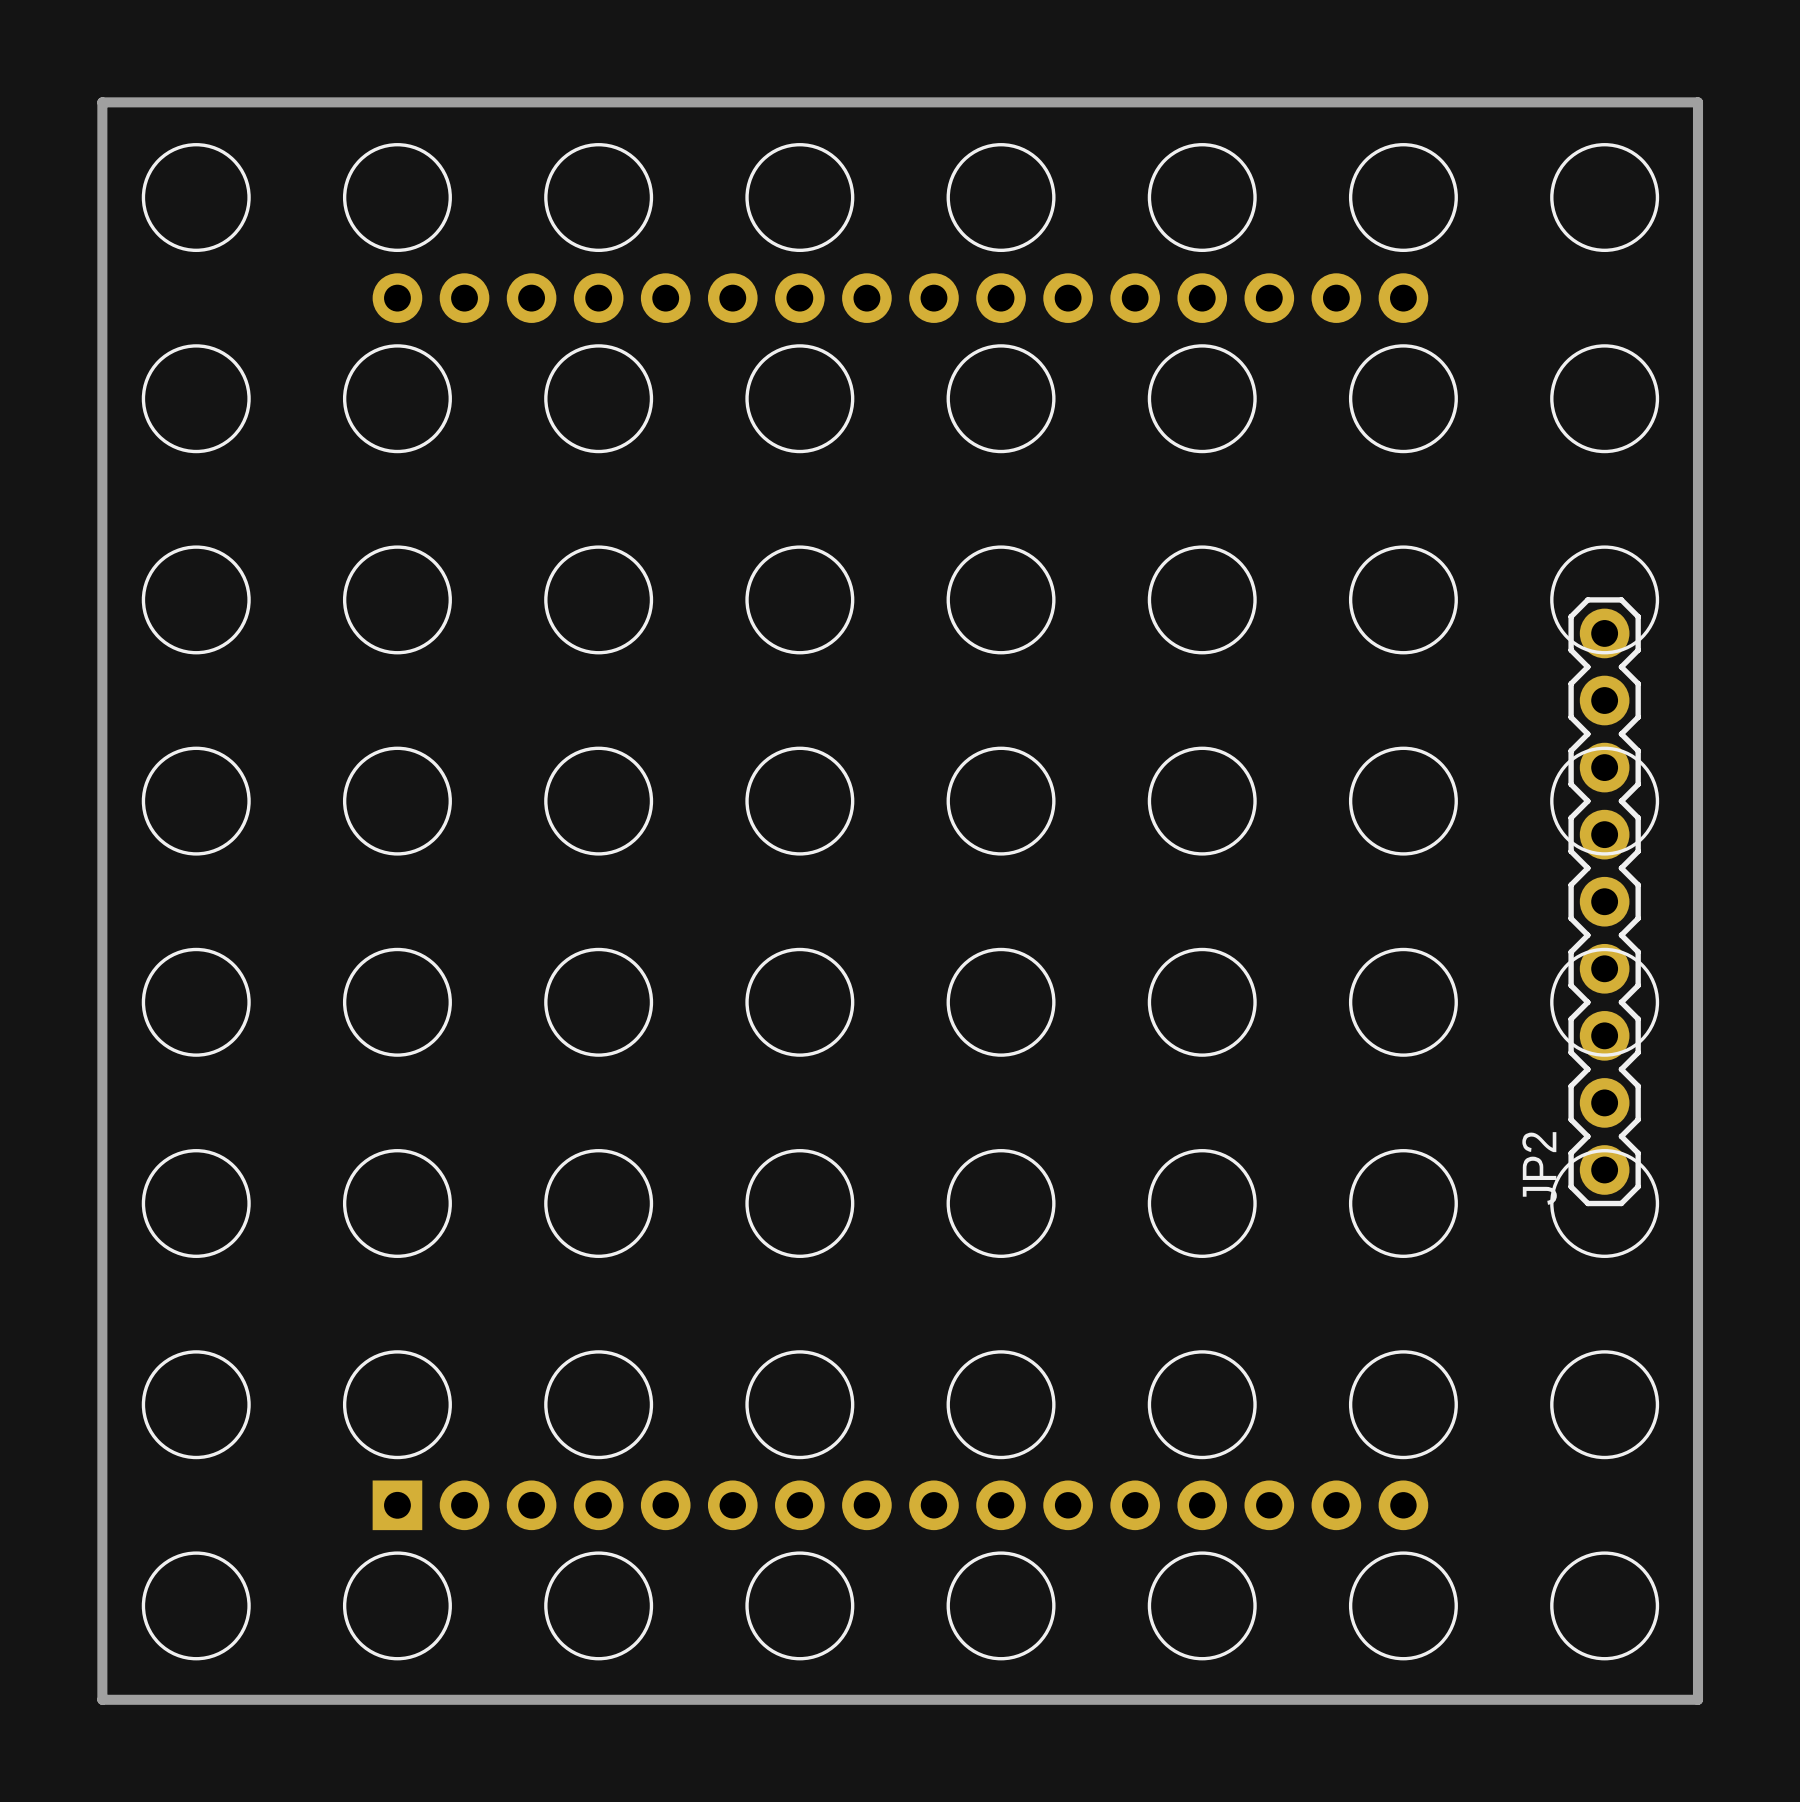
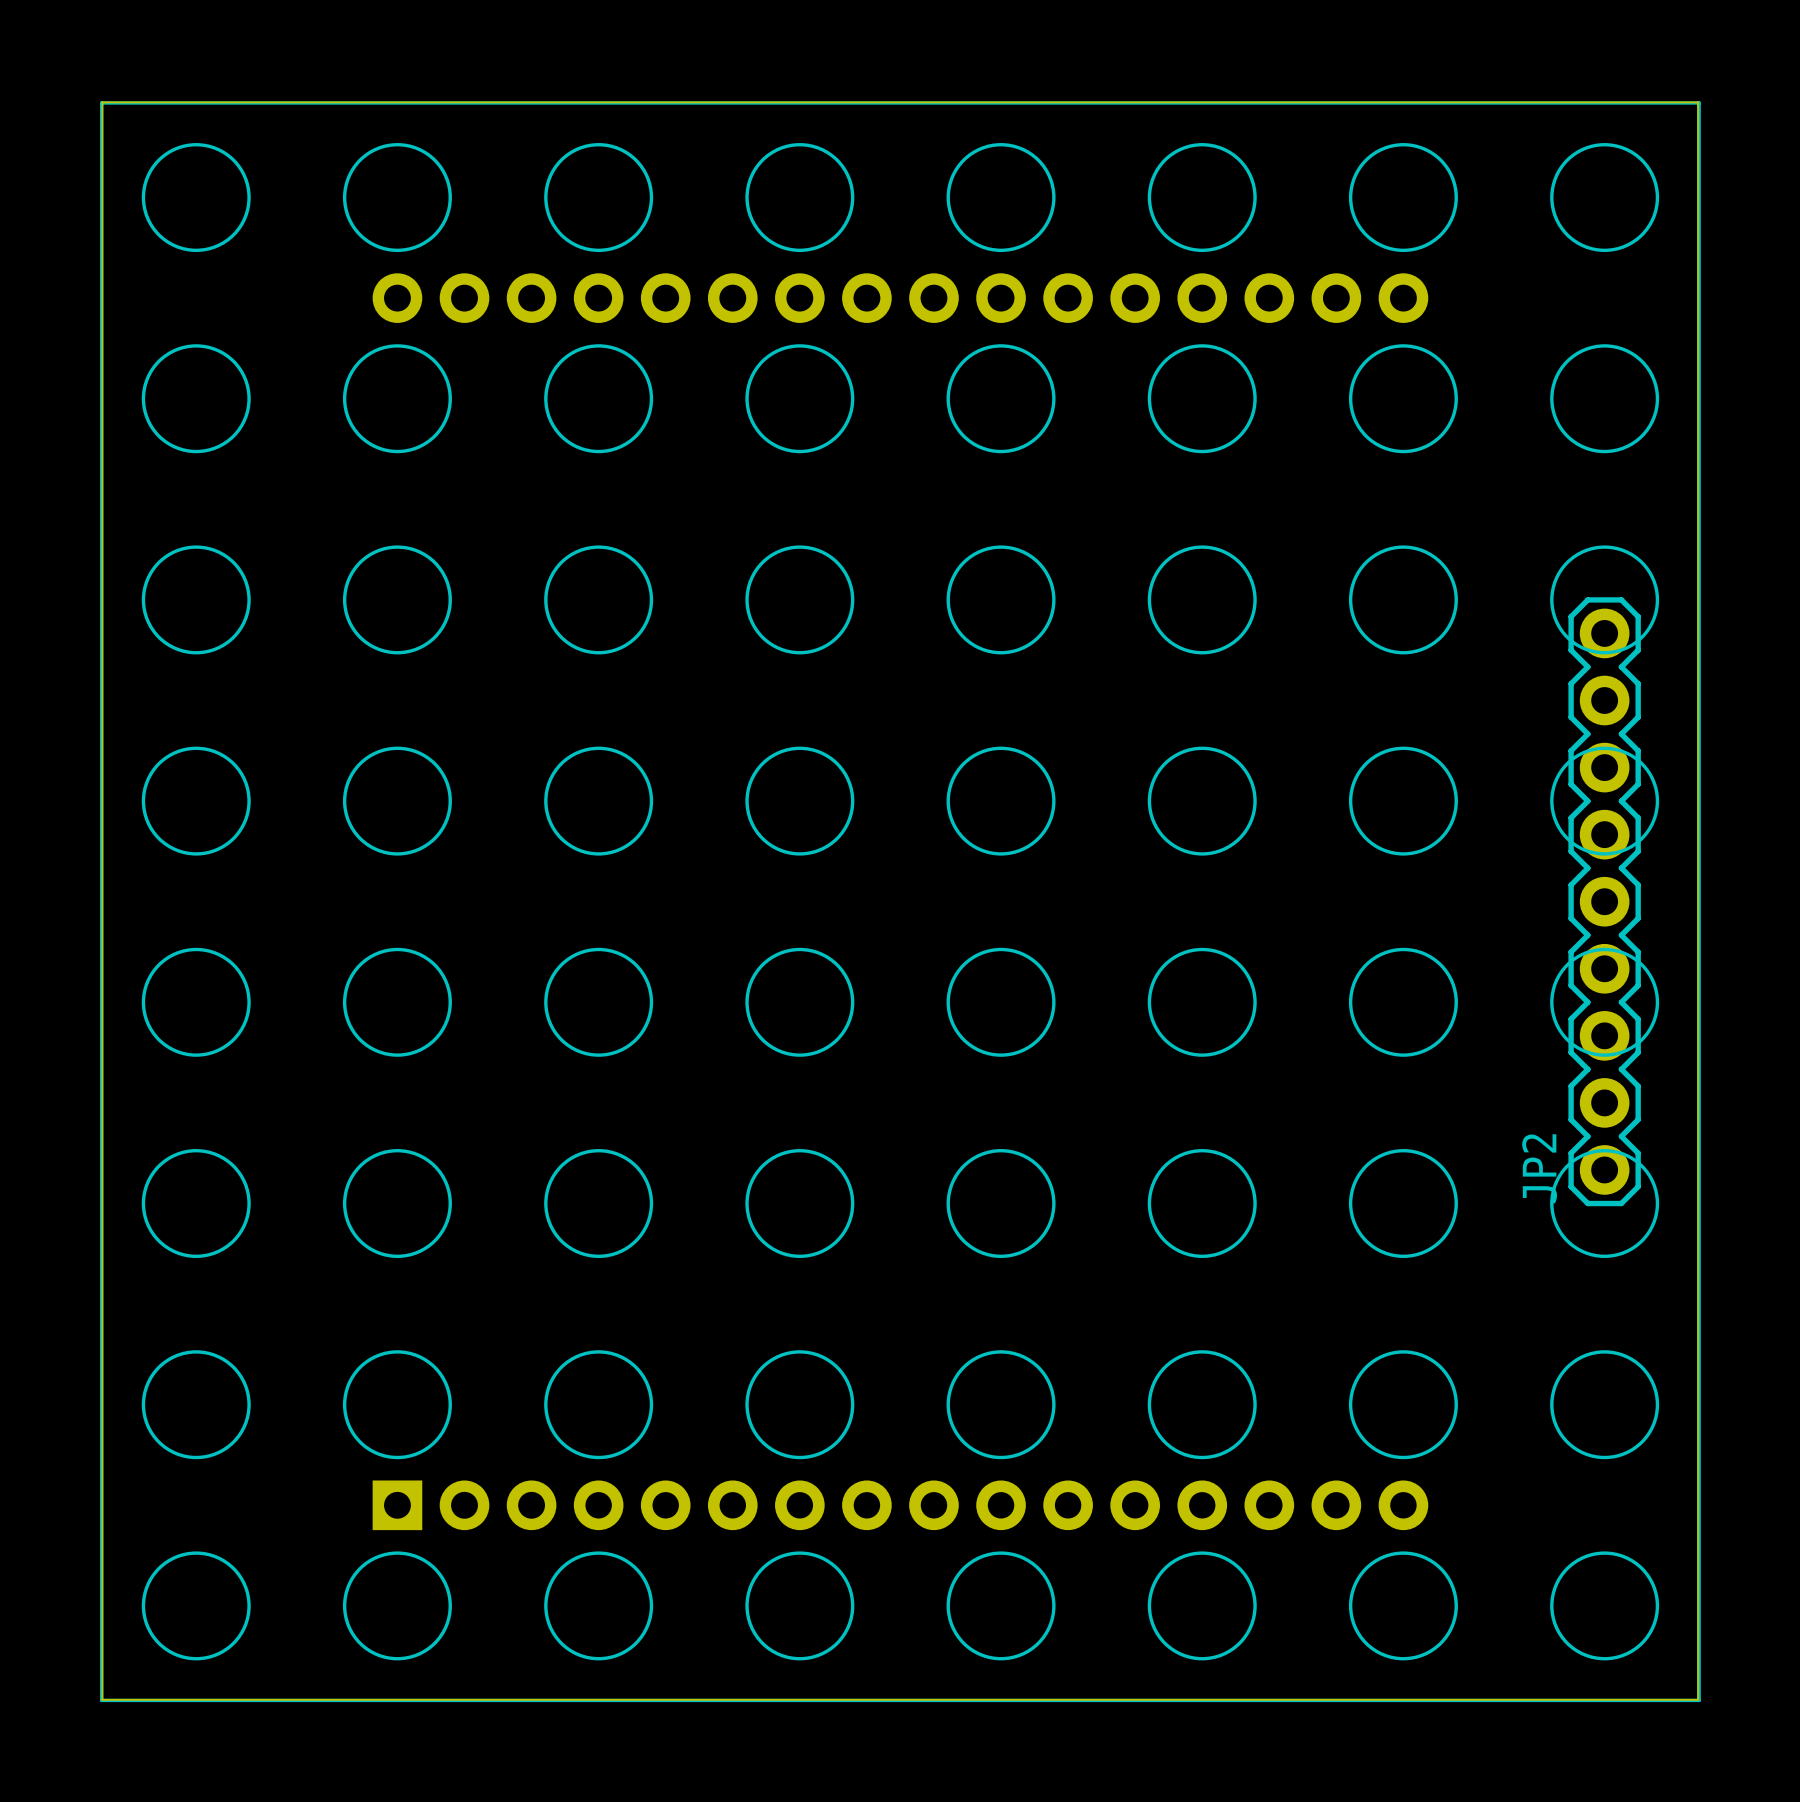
board edge width: thick (102, 102) (1698, 102) (1698, 1699) (102, 1699) (102, 102) -> thin (102, 102) (1698, 102) (1698, 1699) (102, 1699) (102, 102)

